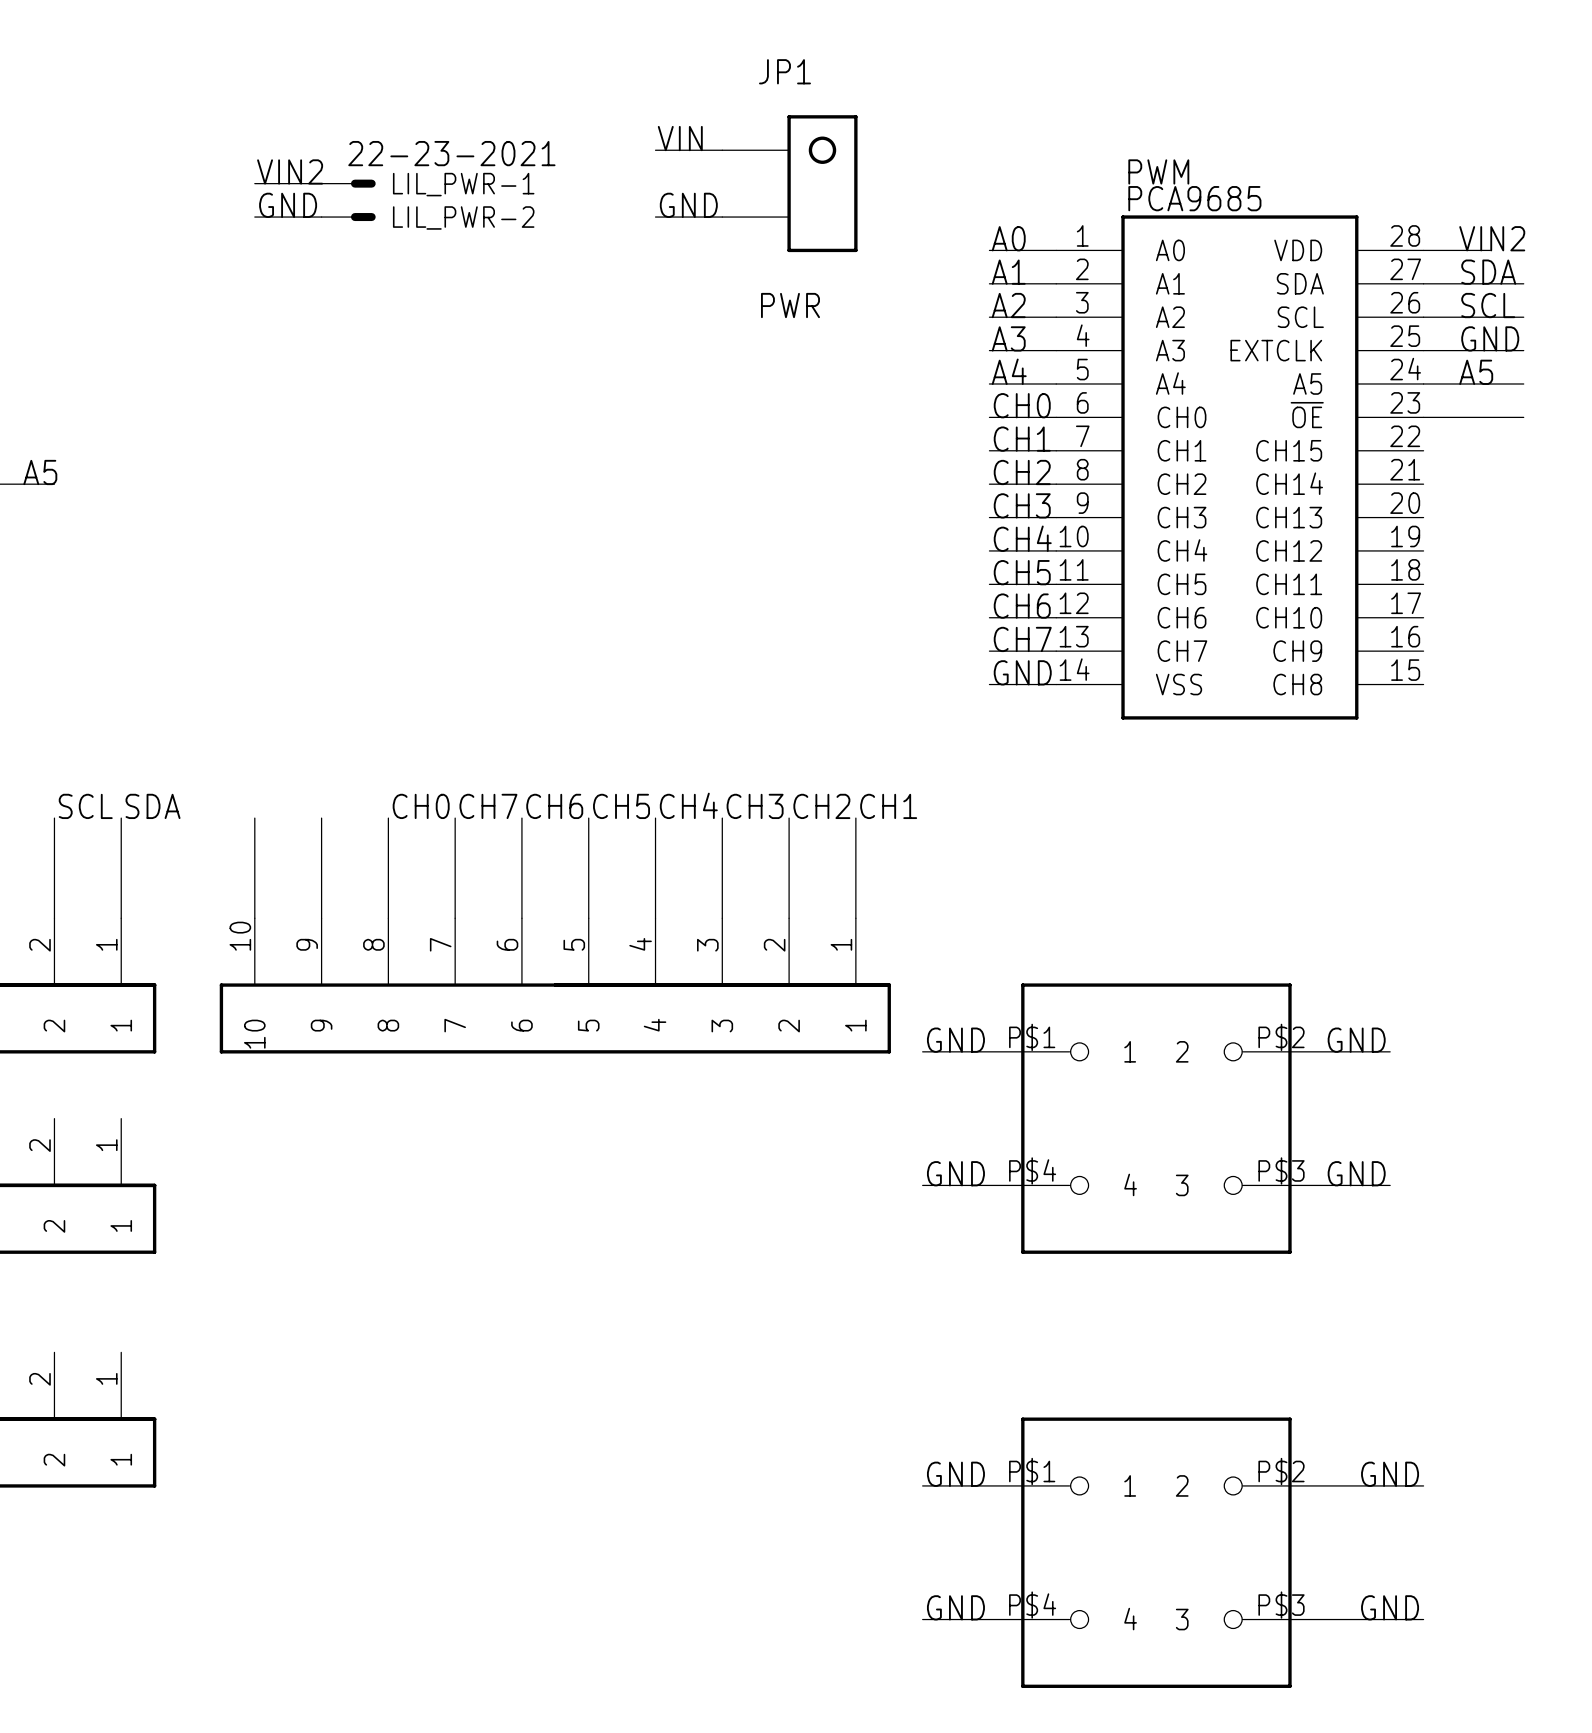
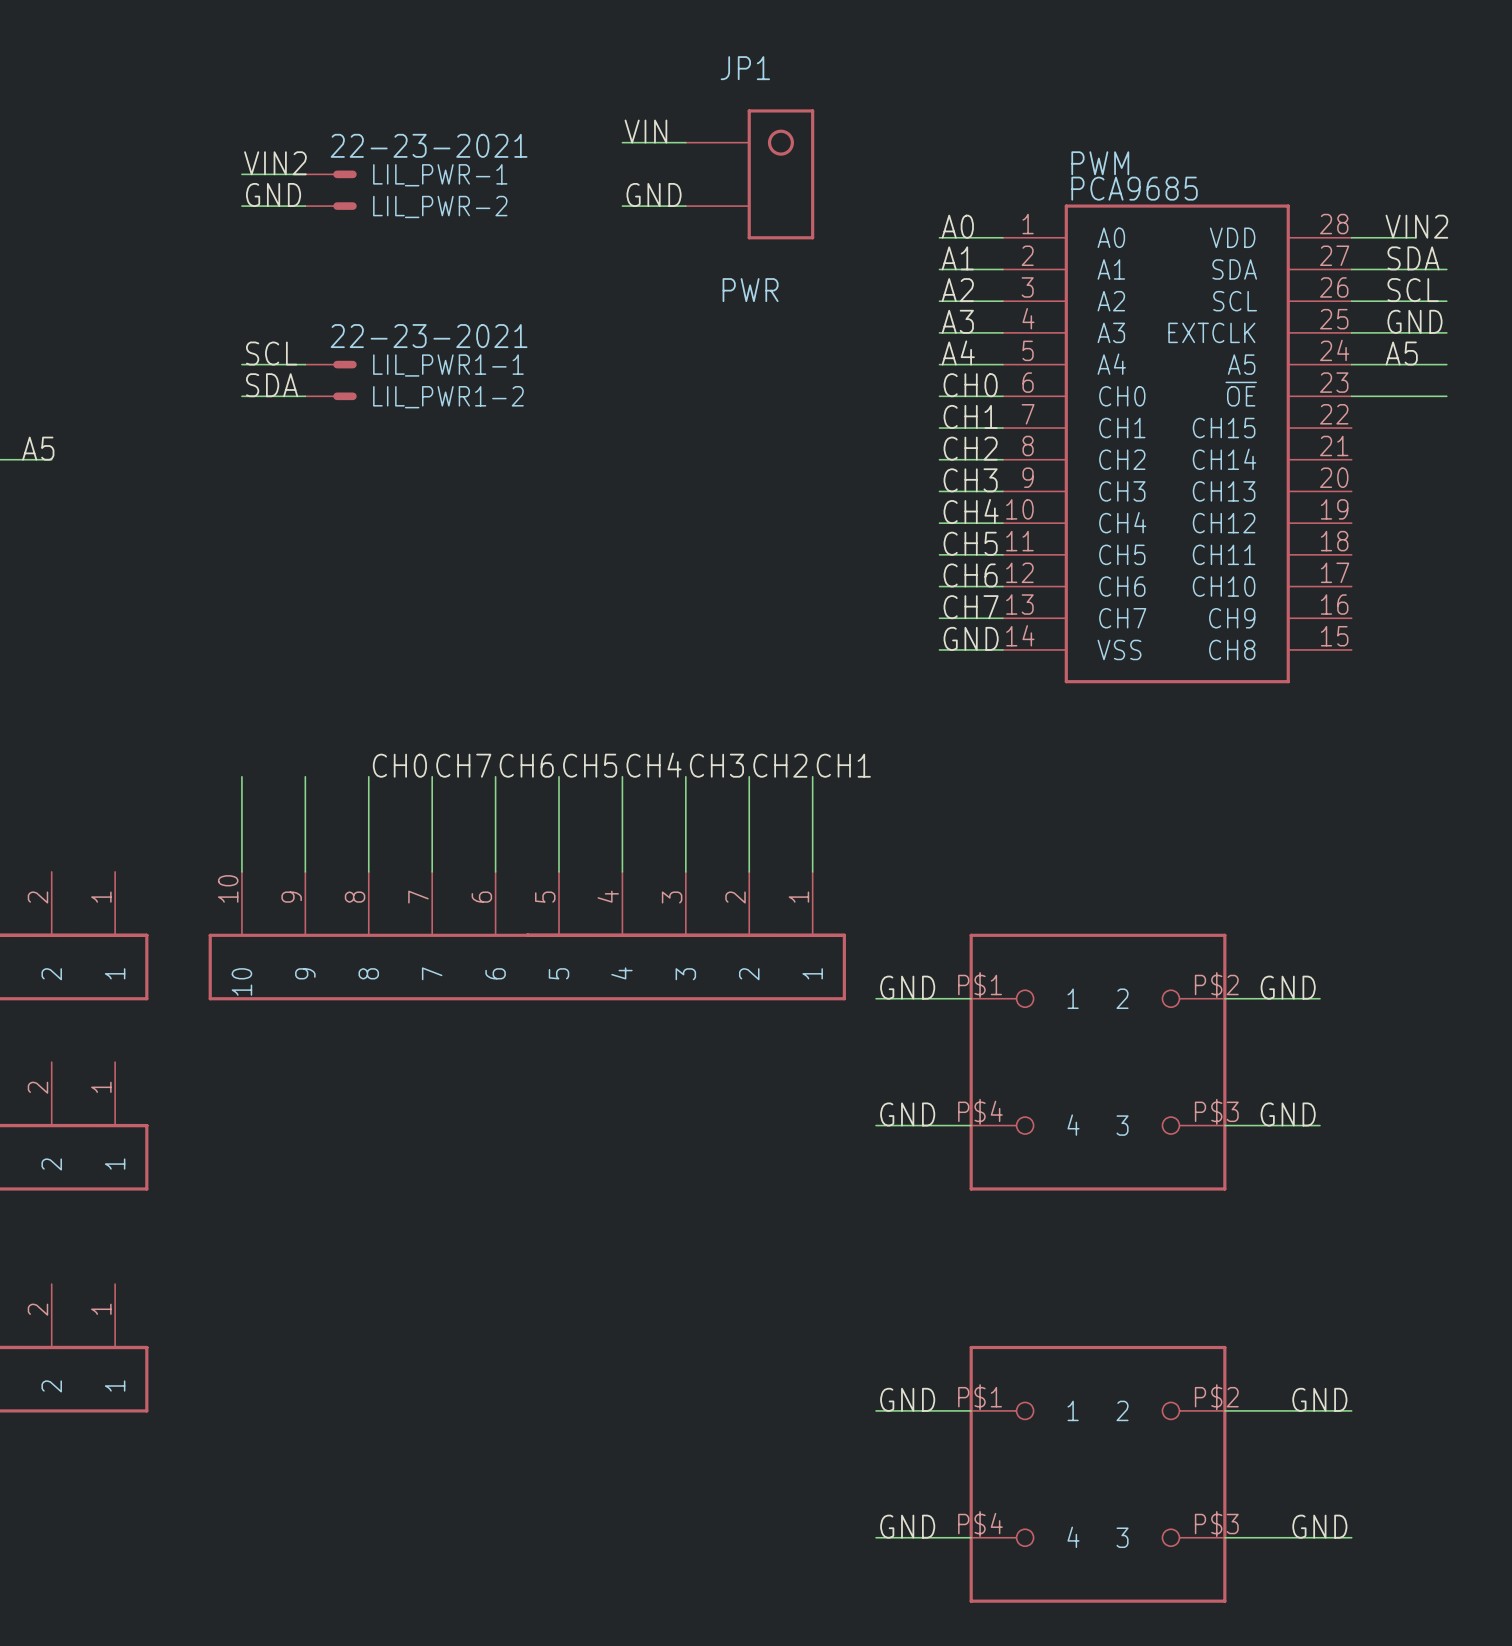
label: none -> SCL (271, 353)
wire: none -> (241, 364) (305, 364)
LIL_PWR1-1: none -> 22-23-2021 (331, 364)
label: none -> SDA (272, 385)
wire: none -> (241, 396) (305, 396)
LIL_PWR1-2: none -> (331, 396)
label: SCL (85, 806) -> none
label: SDA (153, 806) -> none
wire: (54, 818) (54, 918) -> none
wire: (121, 818) (121, 918) -> none

